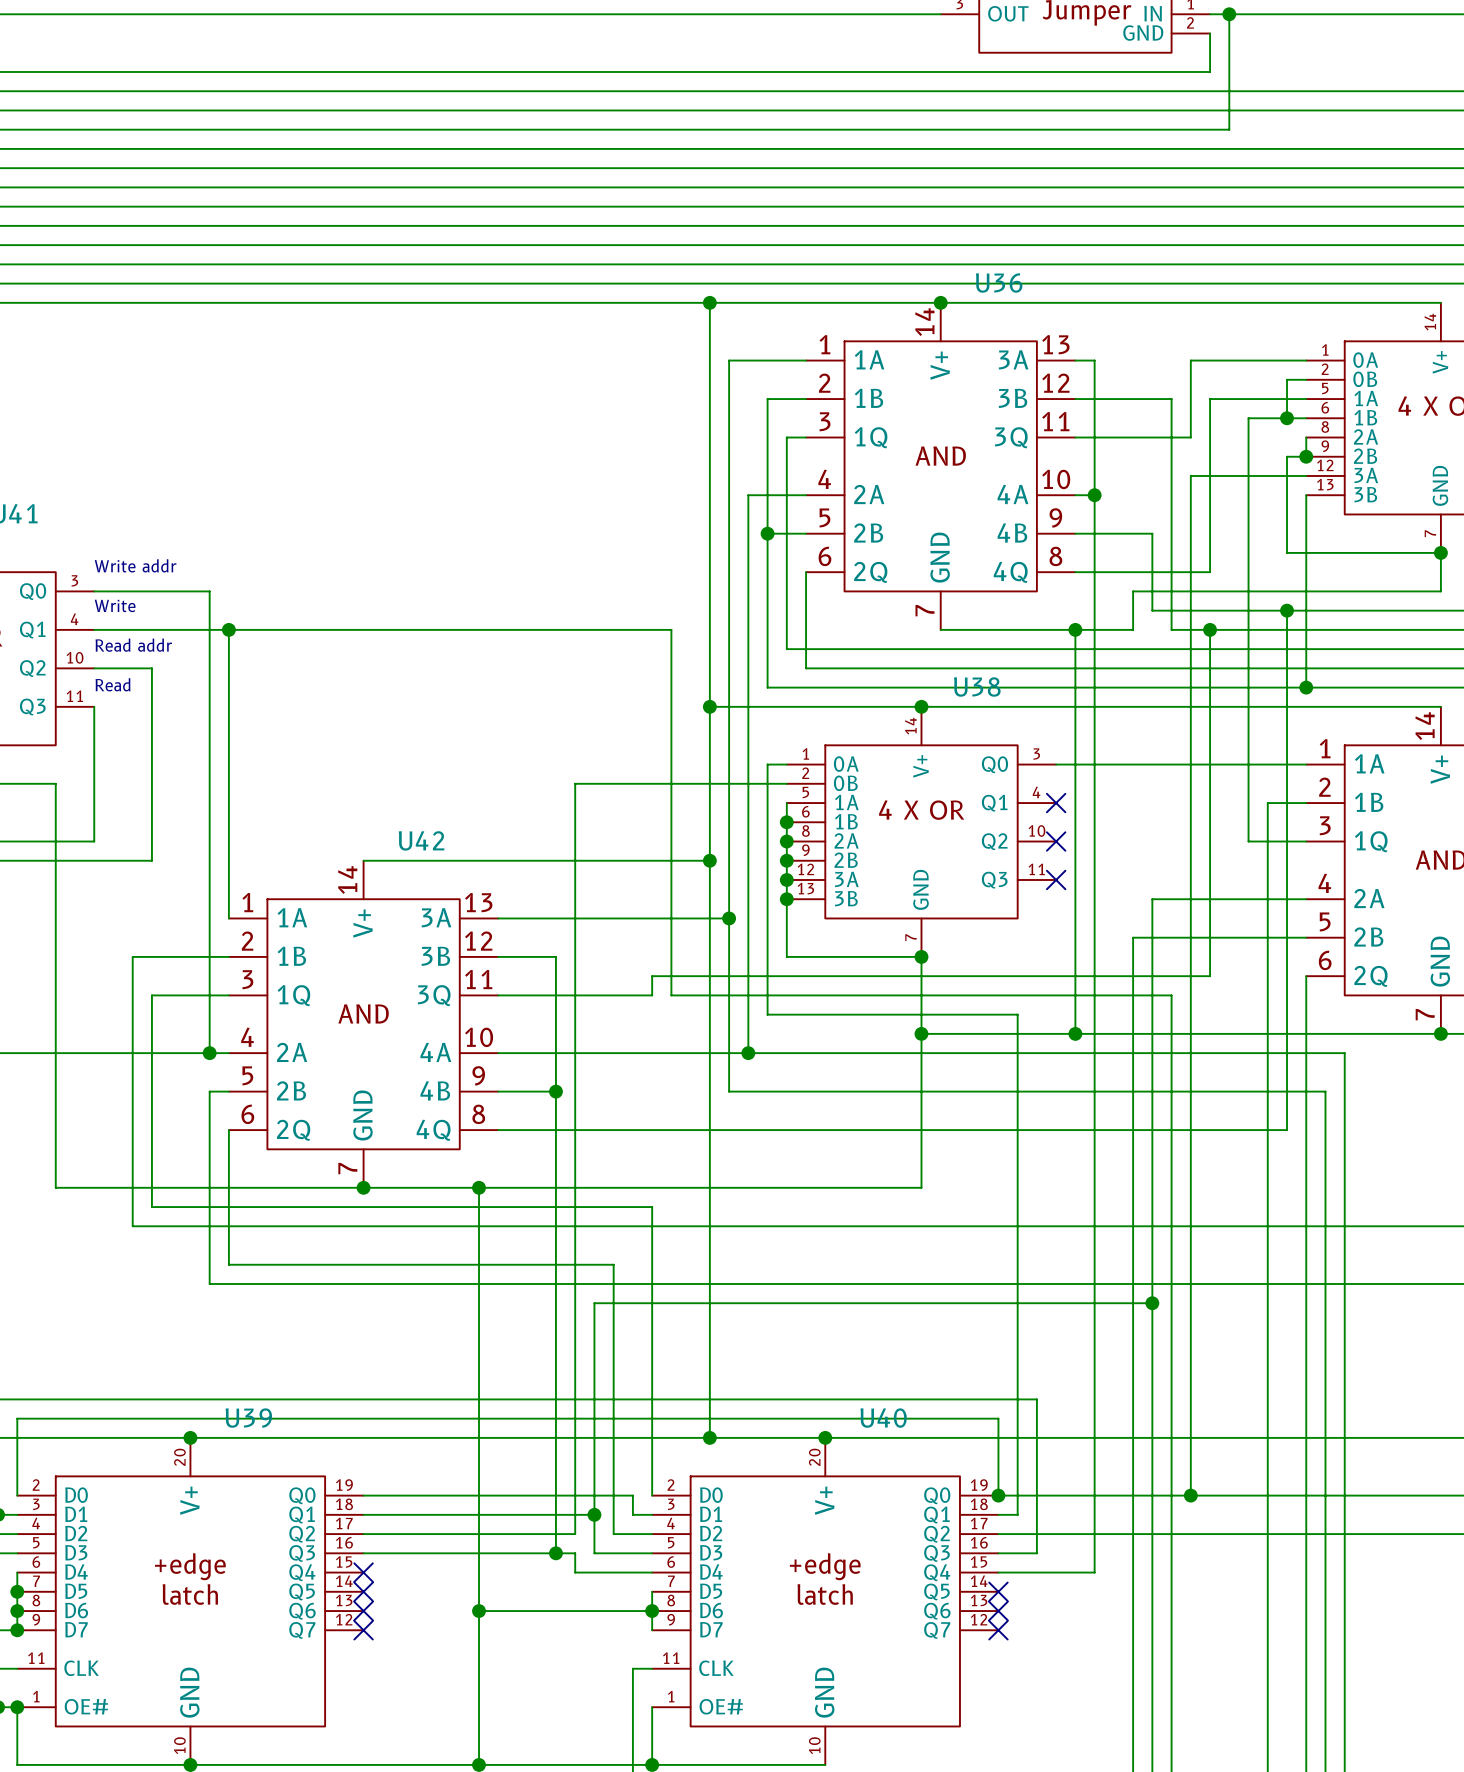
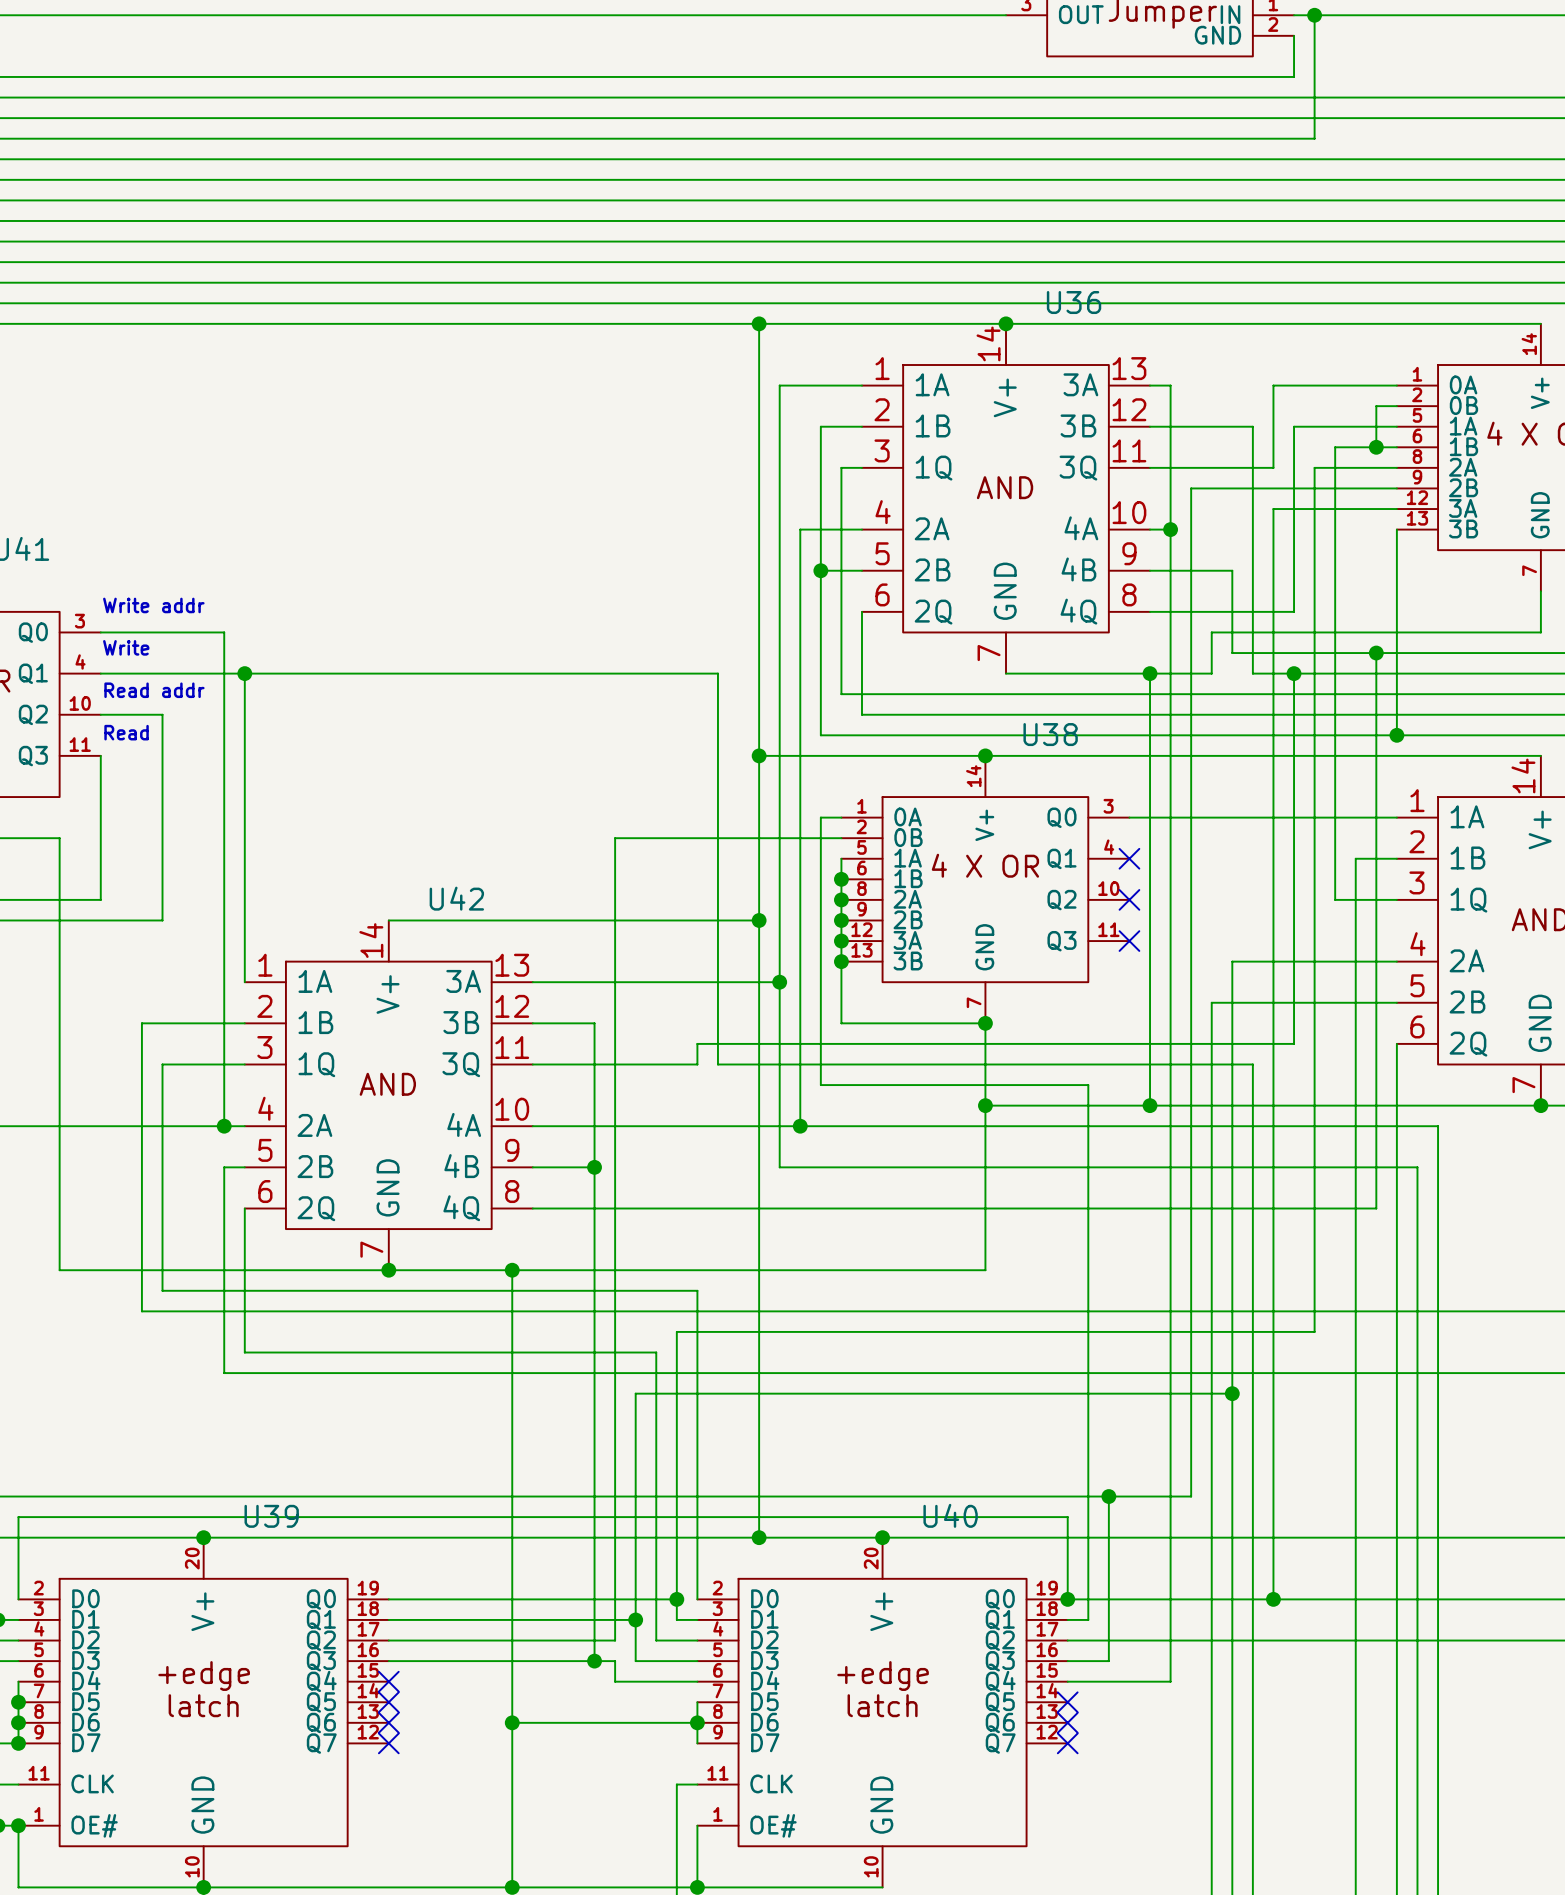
wire: (1306, 437) (1306, 456) -> (1396, 467) (1314, 467) (1314, 1331) (676, 1331) (676, 1599)
wire: (1287, 456) (1287, 552) (1440, 552) -> (1376, 488) (1191, 488) (1191, 1496) (1108, 1496)
junction: (1306, 456) -> none
junction: (1440, 552) -> none
junction: none -> (1108, 1496)
junction: none -> (676, 1599)

